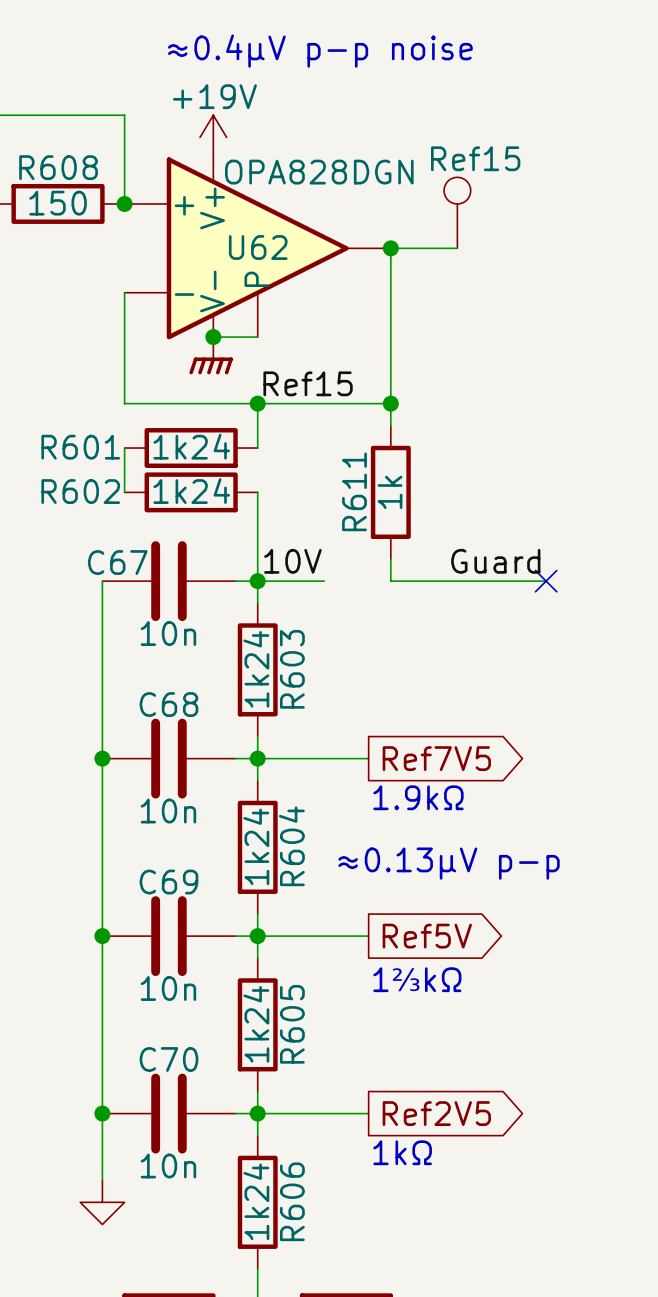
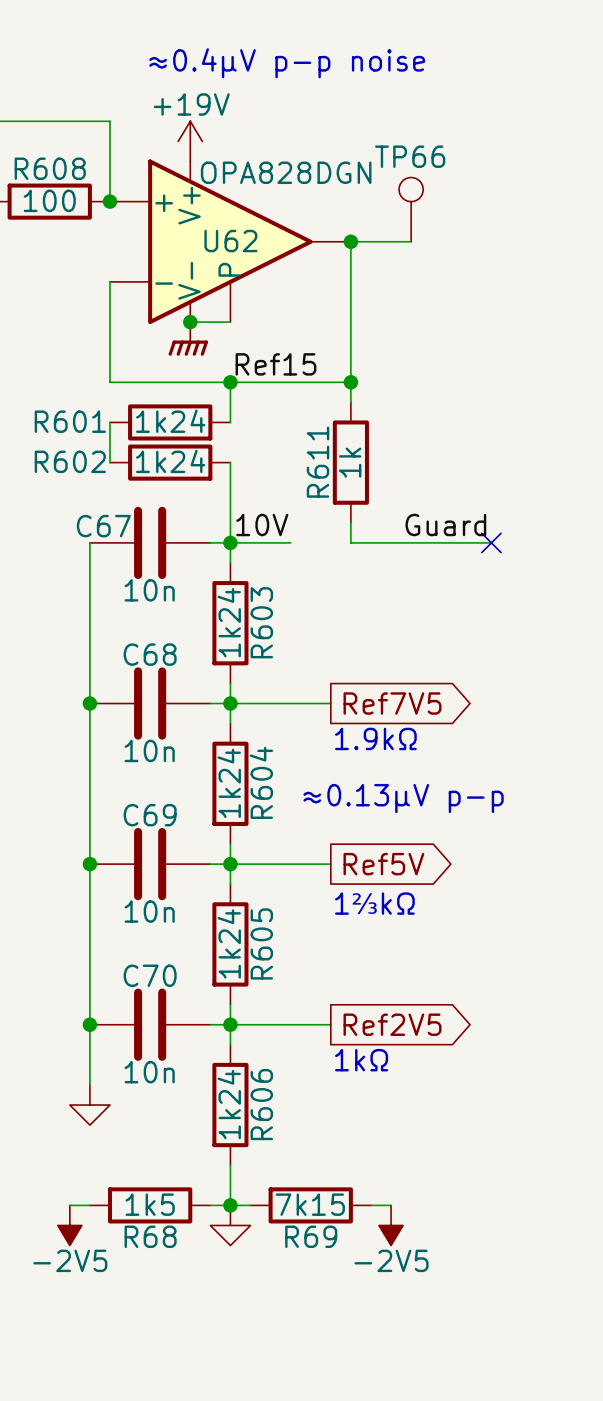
Ref15 name: Ref15 (475, 158) -> TP66 (410, 156)
R608 value: 150 (58, 203) -> 100 (49, 200)

